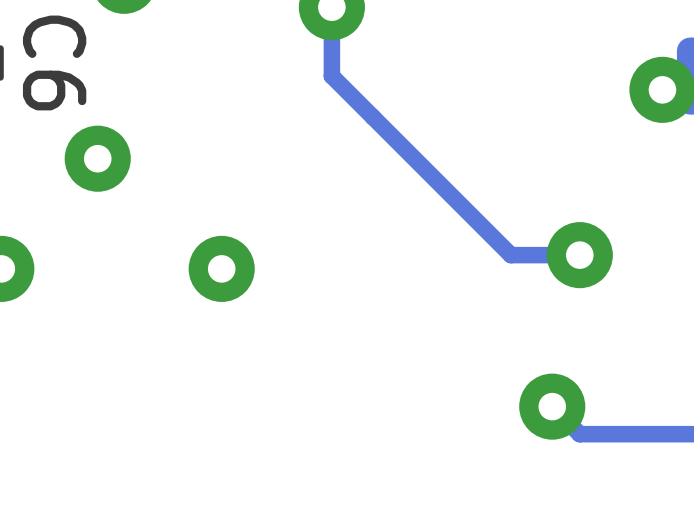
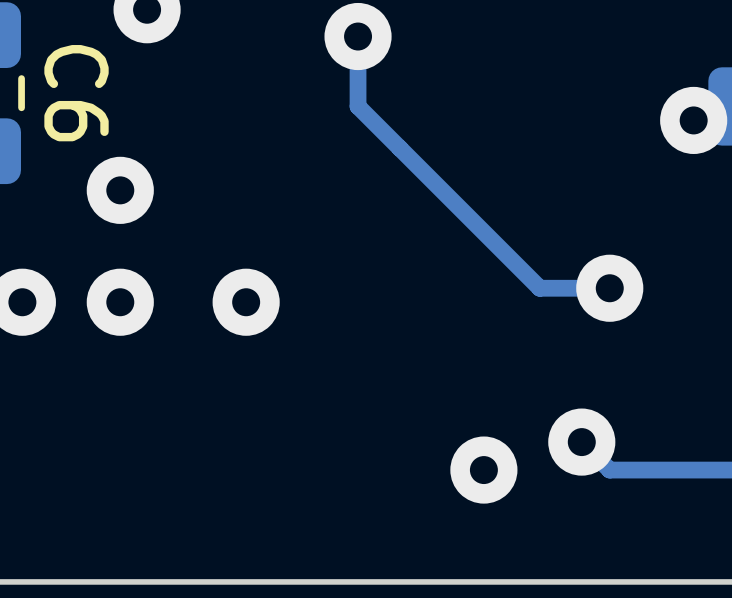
via: none -> (120, 302)
via: none -> (483, 470)

